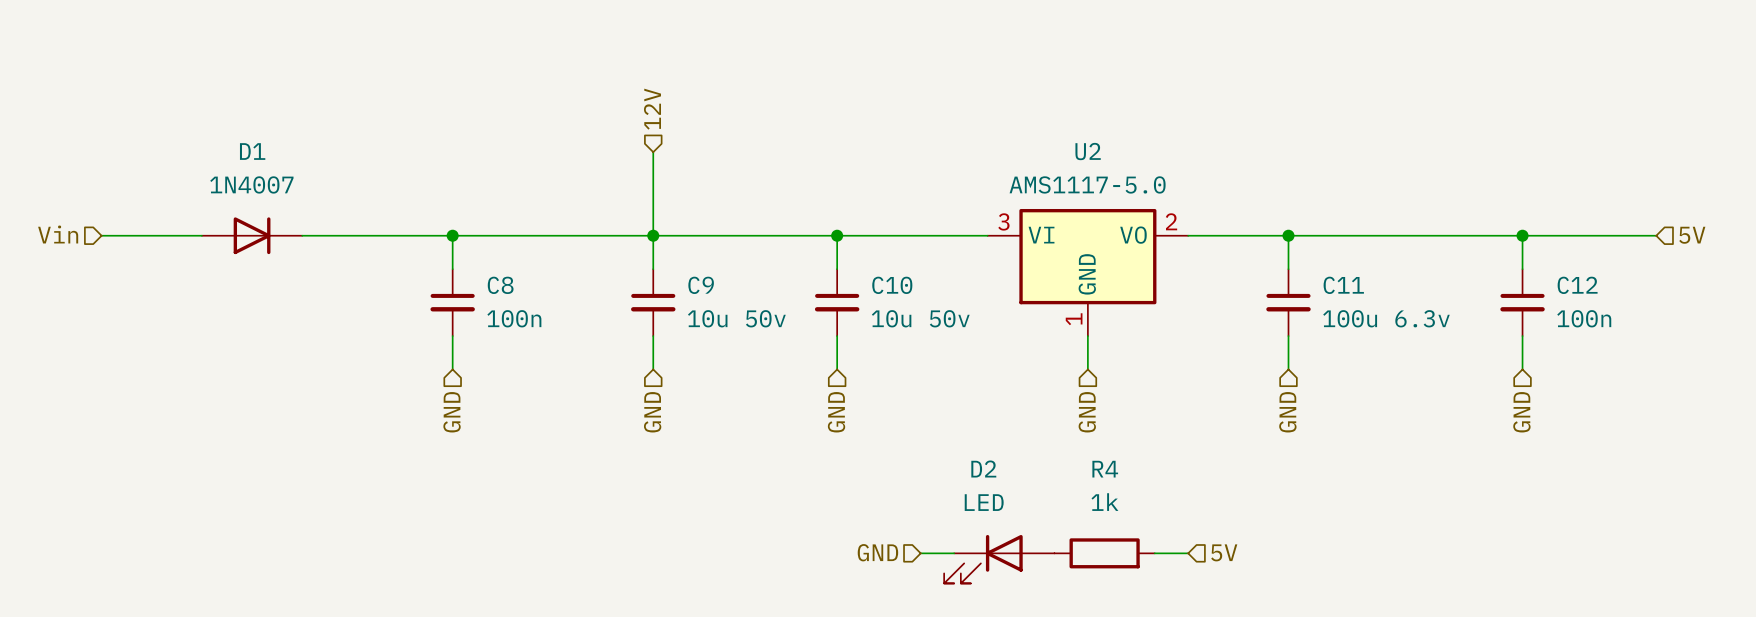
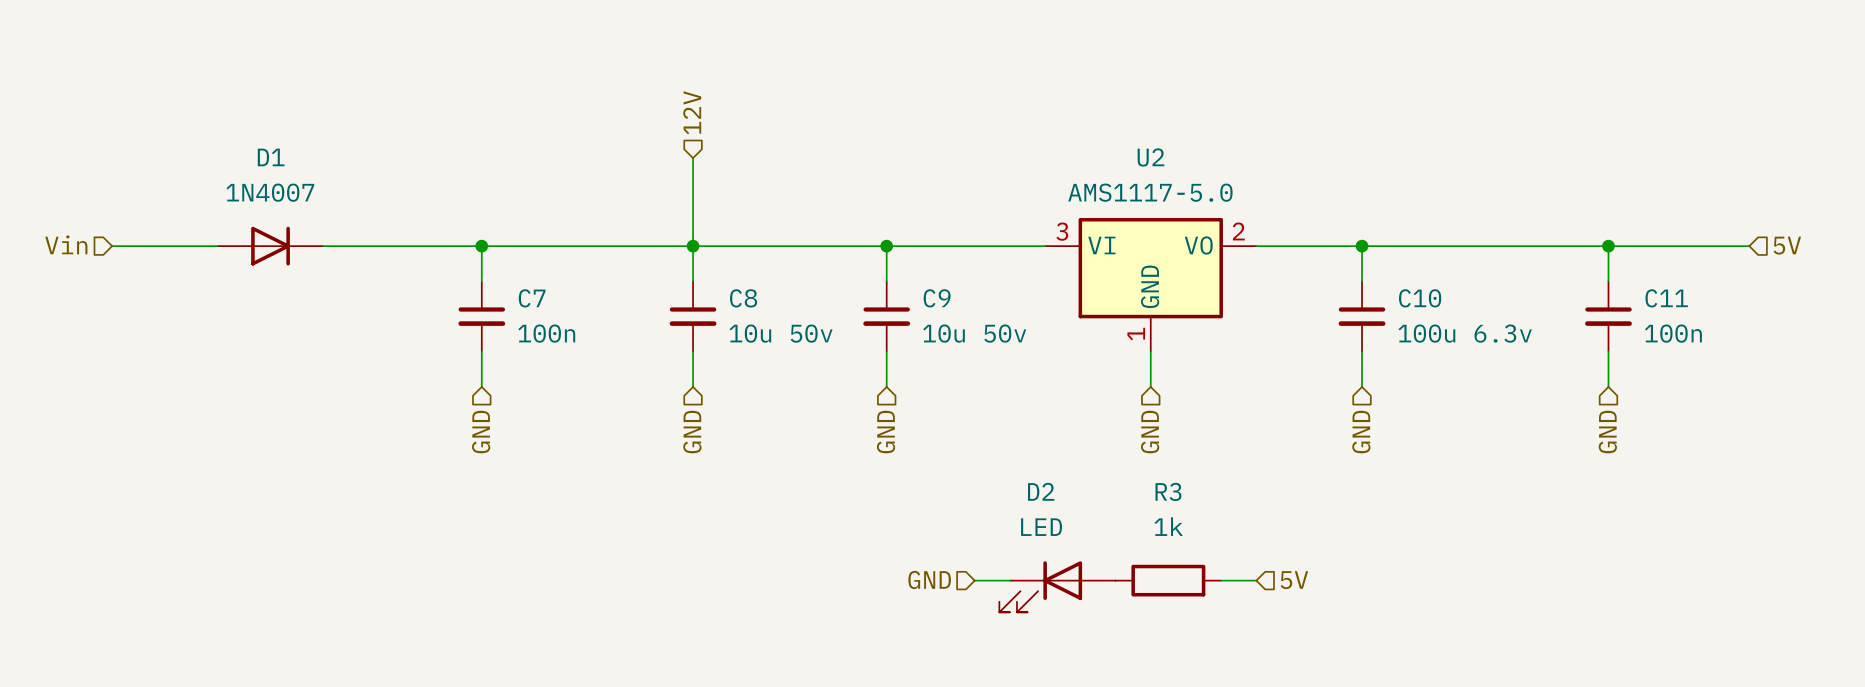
C8 name: C8 (500, 285) -> C7 (532, 298)
C9 name: C9 (701, 285) -> C8 (743, 298)
C10 name: C10 (892, 285) -> C9 (937, 298)
C11 name: C11 (1343, 285) -> C10 (1420, 298)
C12 name: C12 (1577, 285) -> C11 (1666, 298)
R4 name: R4 (1105, 469) -> R3 (1168, 491)

